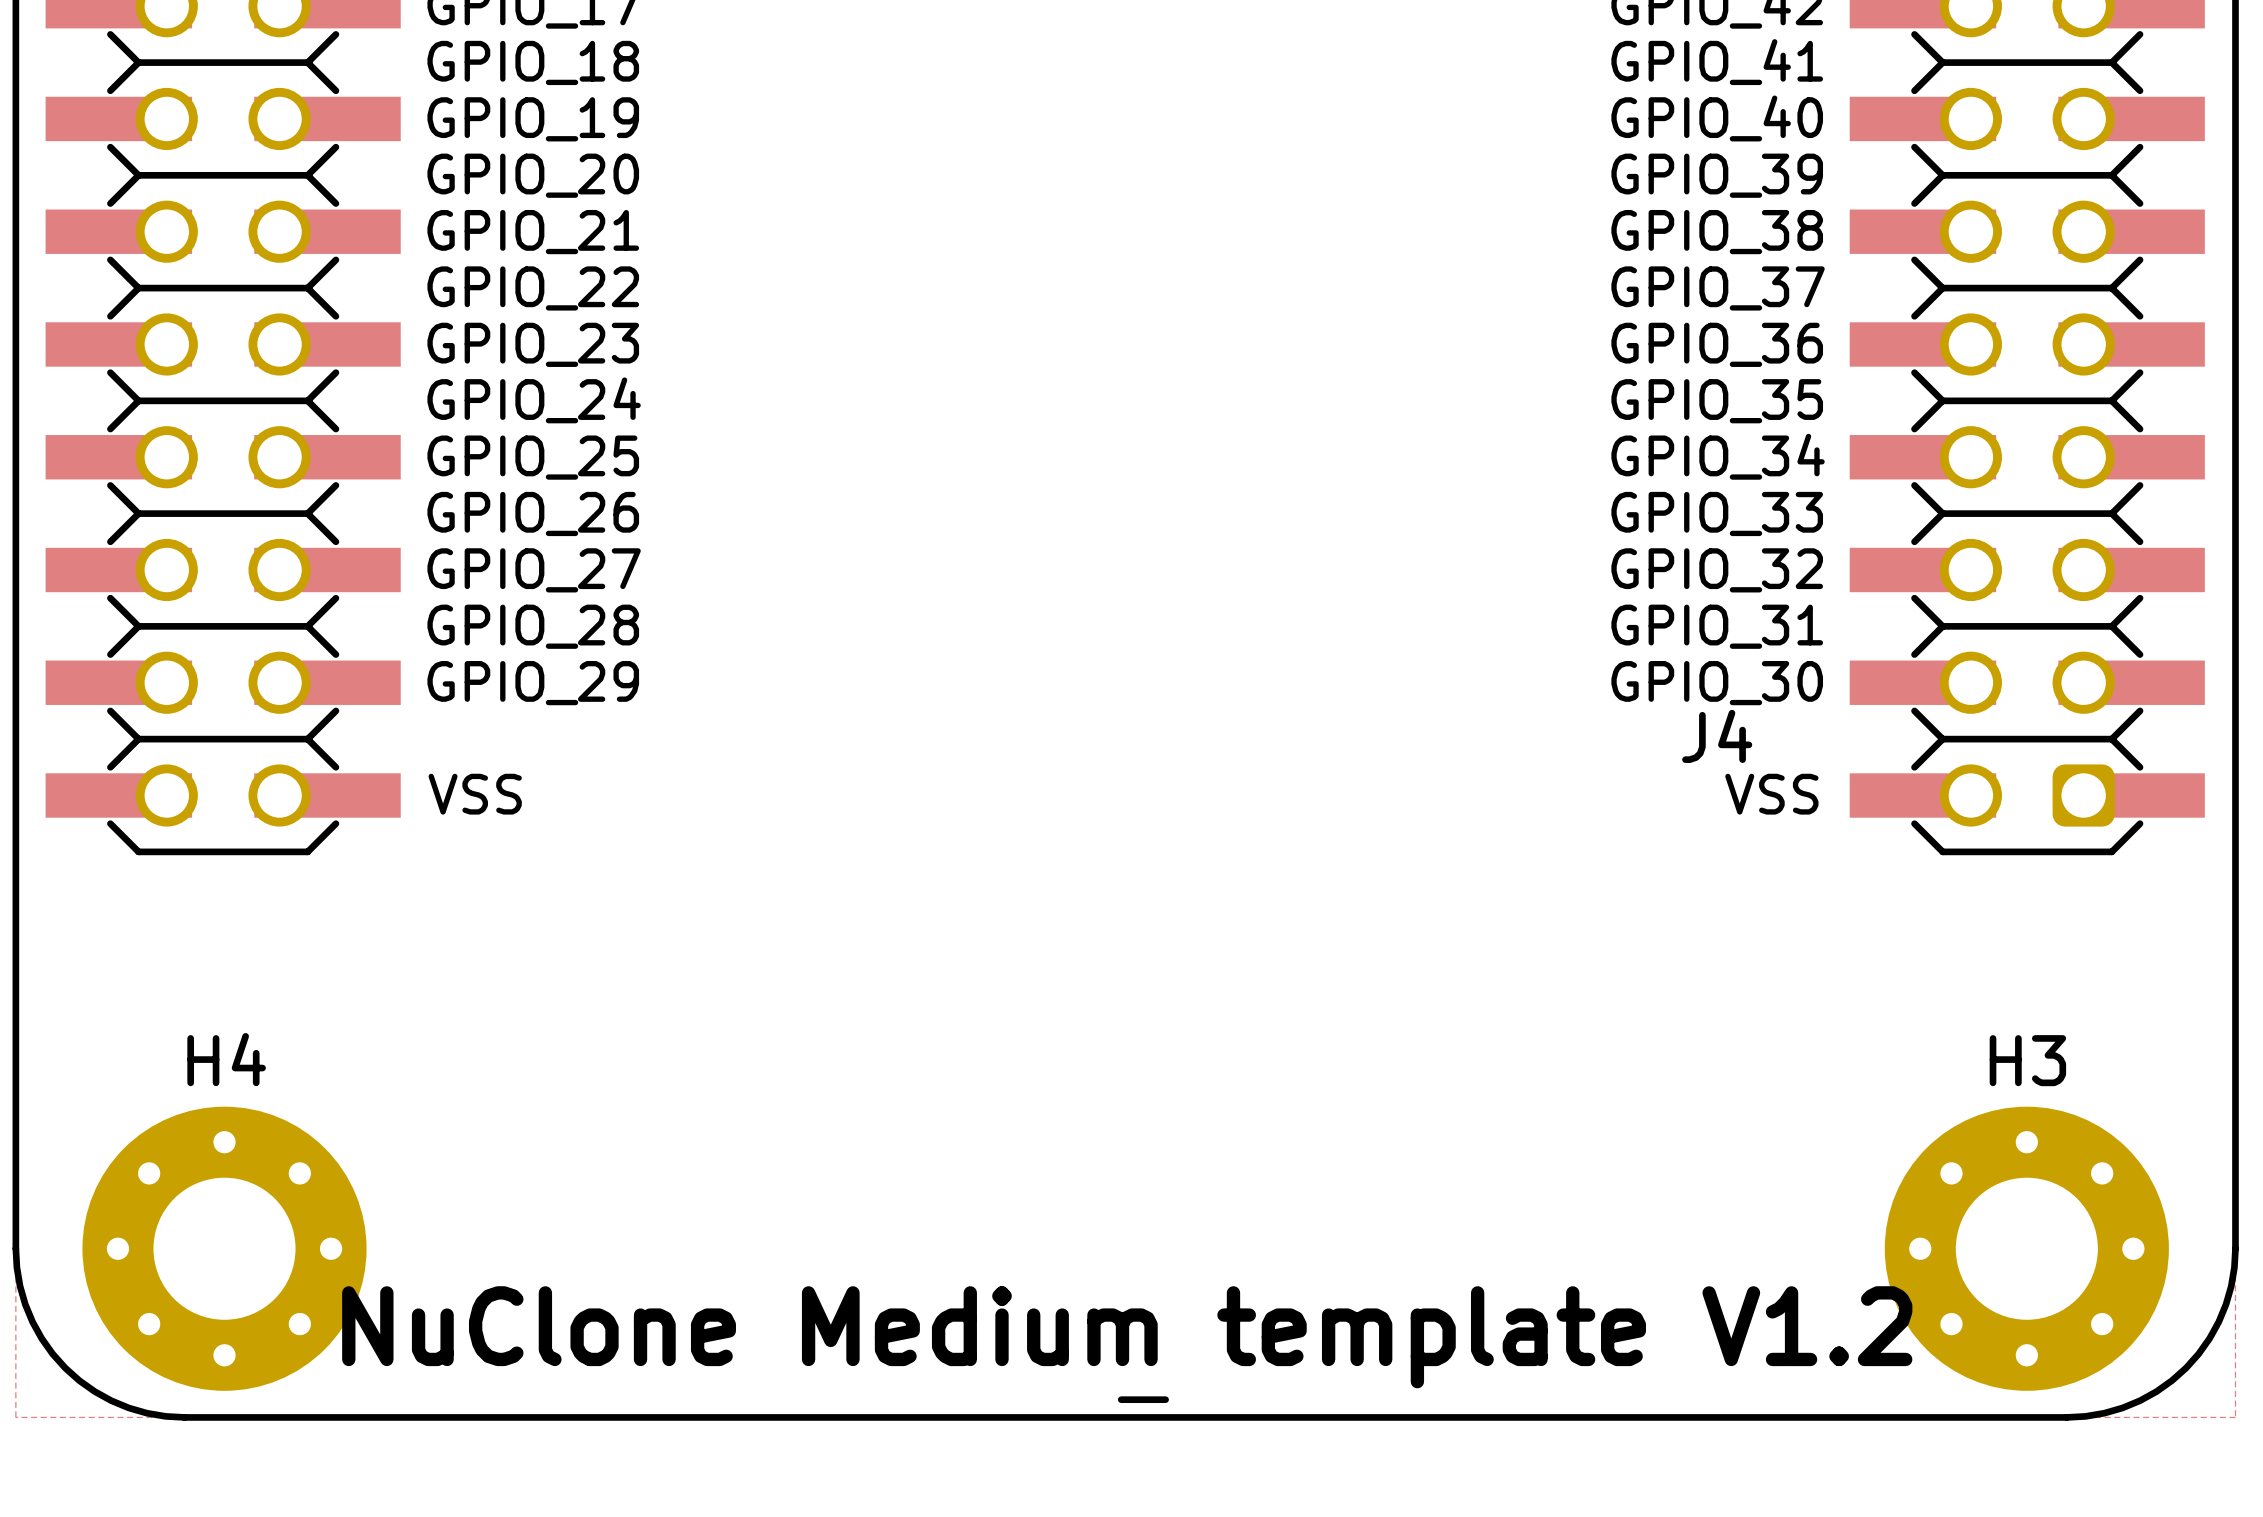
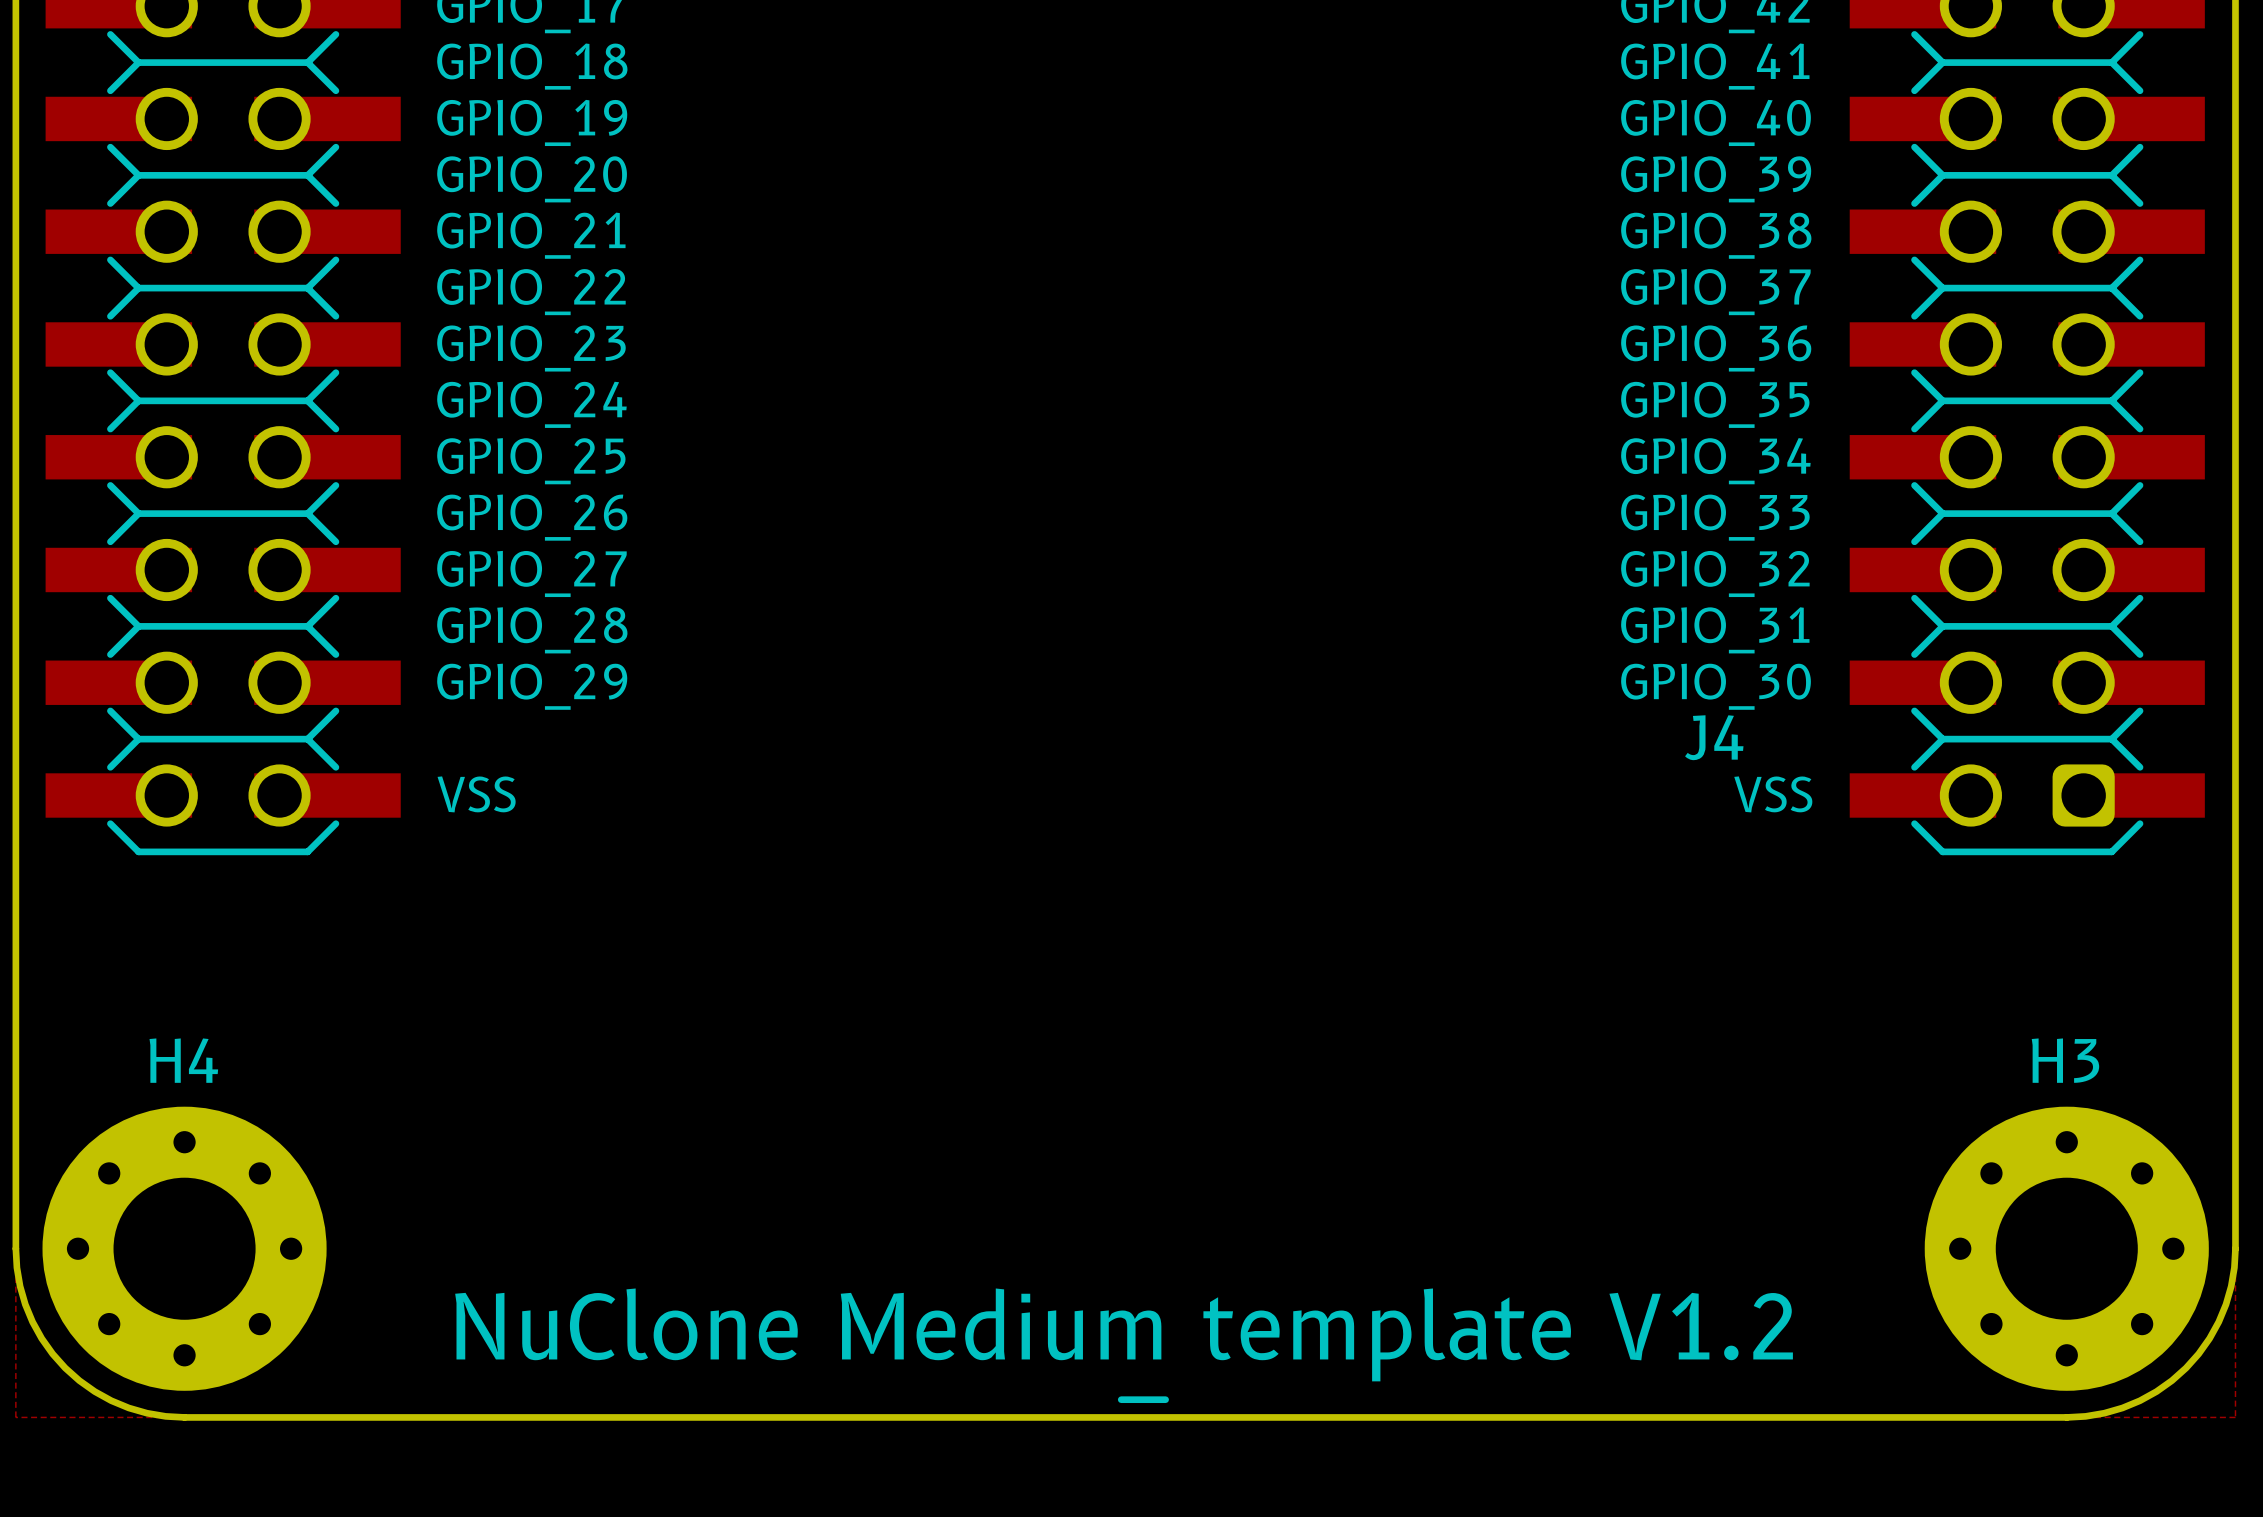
H4 position: (224, 1248) -> (184, 1248)
H3 position: (2026, 1248) -> (2066, 1248)

